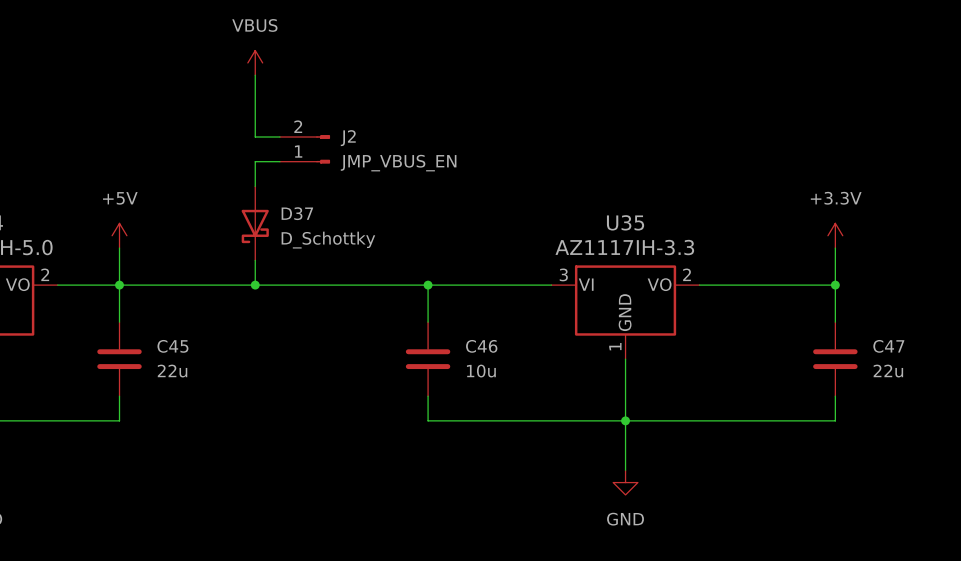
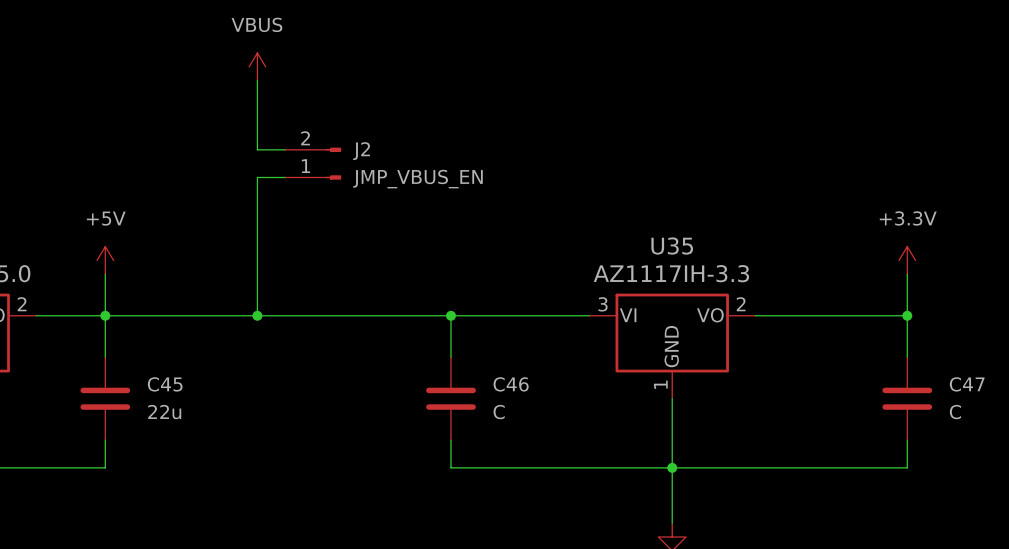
D37: D_Schottky (255, 223) -> none
C46 value: 10u (481, 371) -> C (499, 412)
C47 value: 22u (888, 371) -> C (955, 412)

